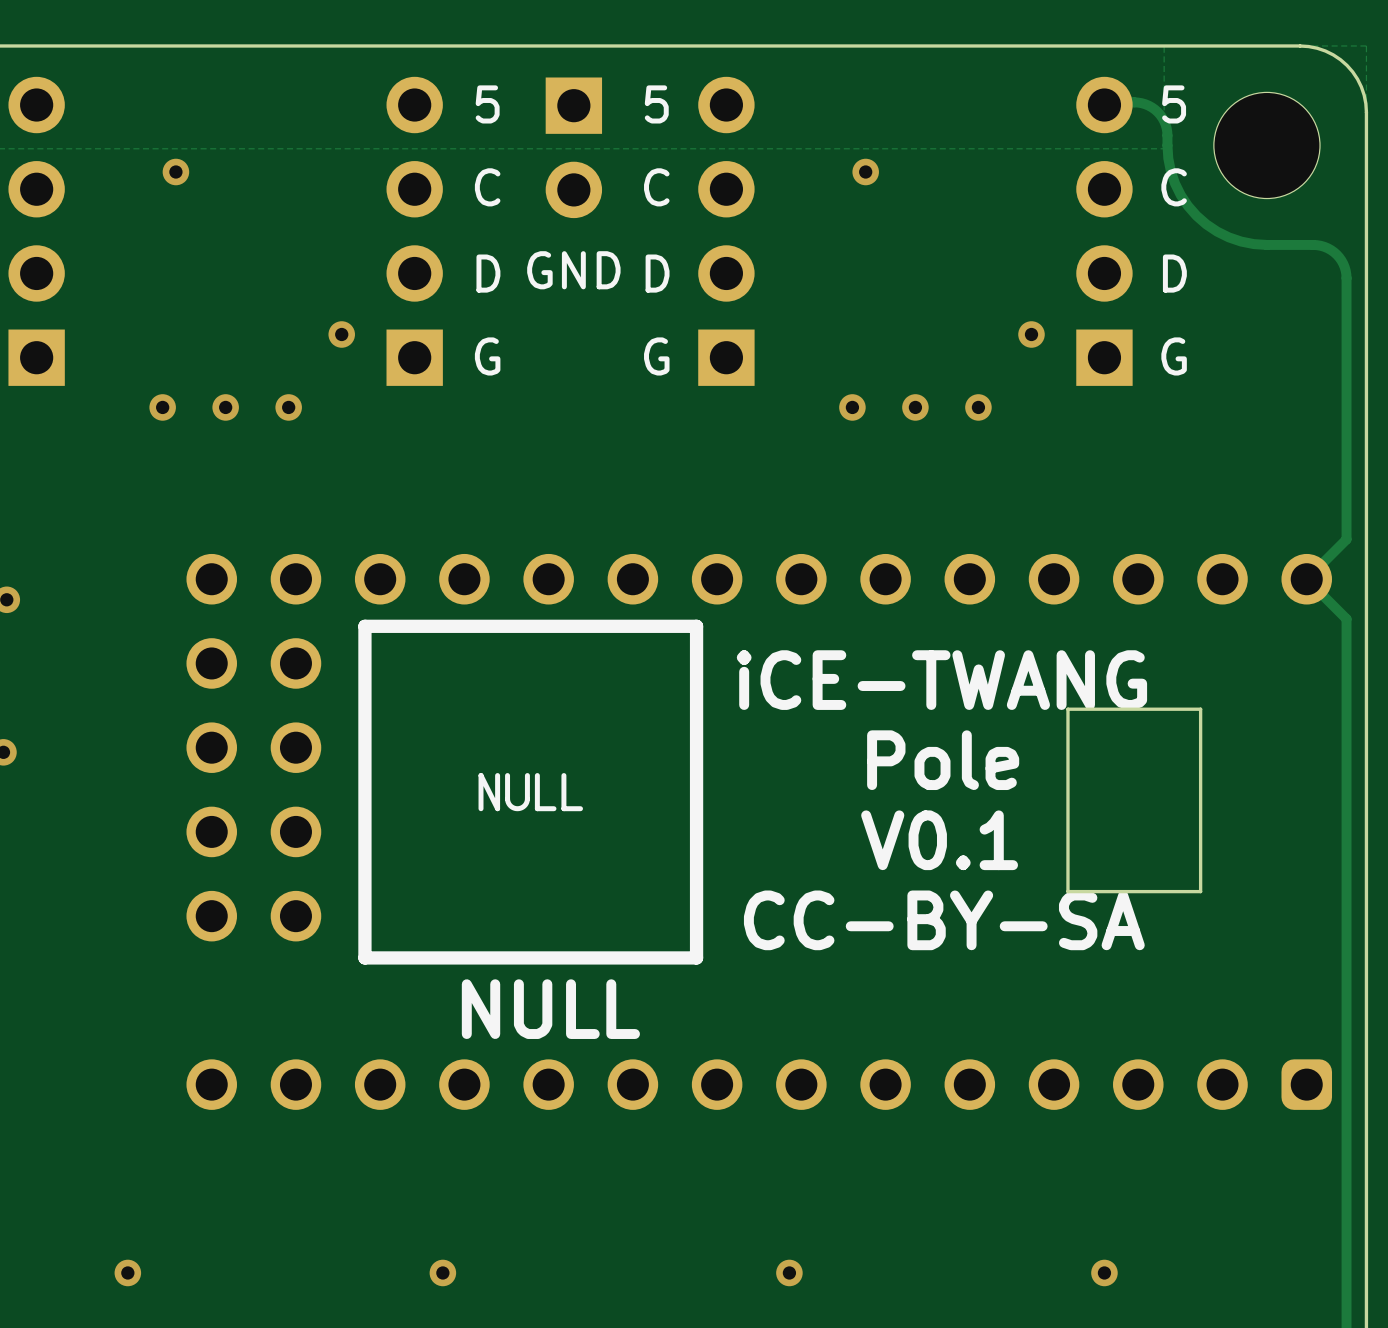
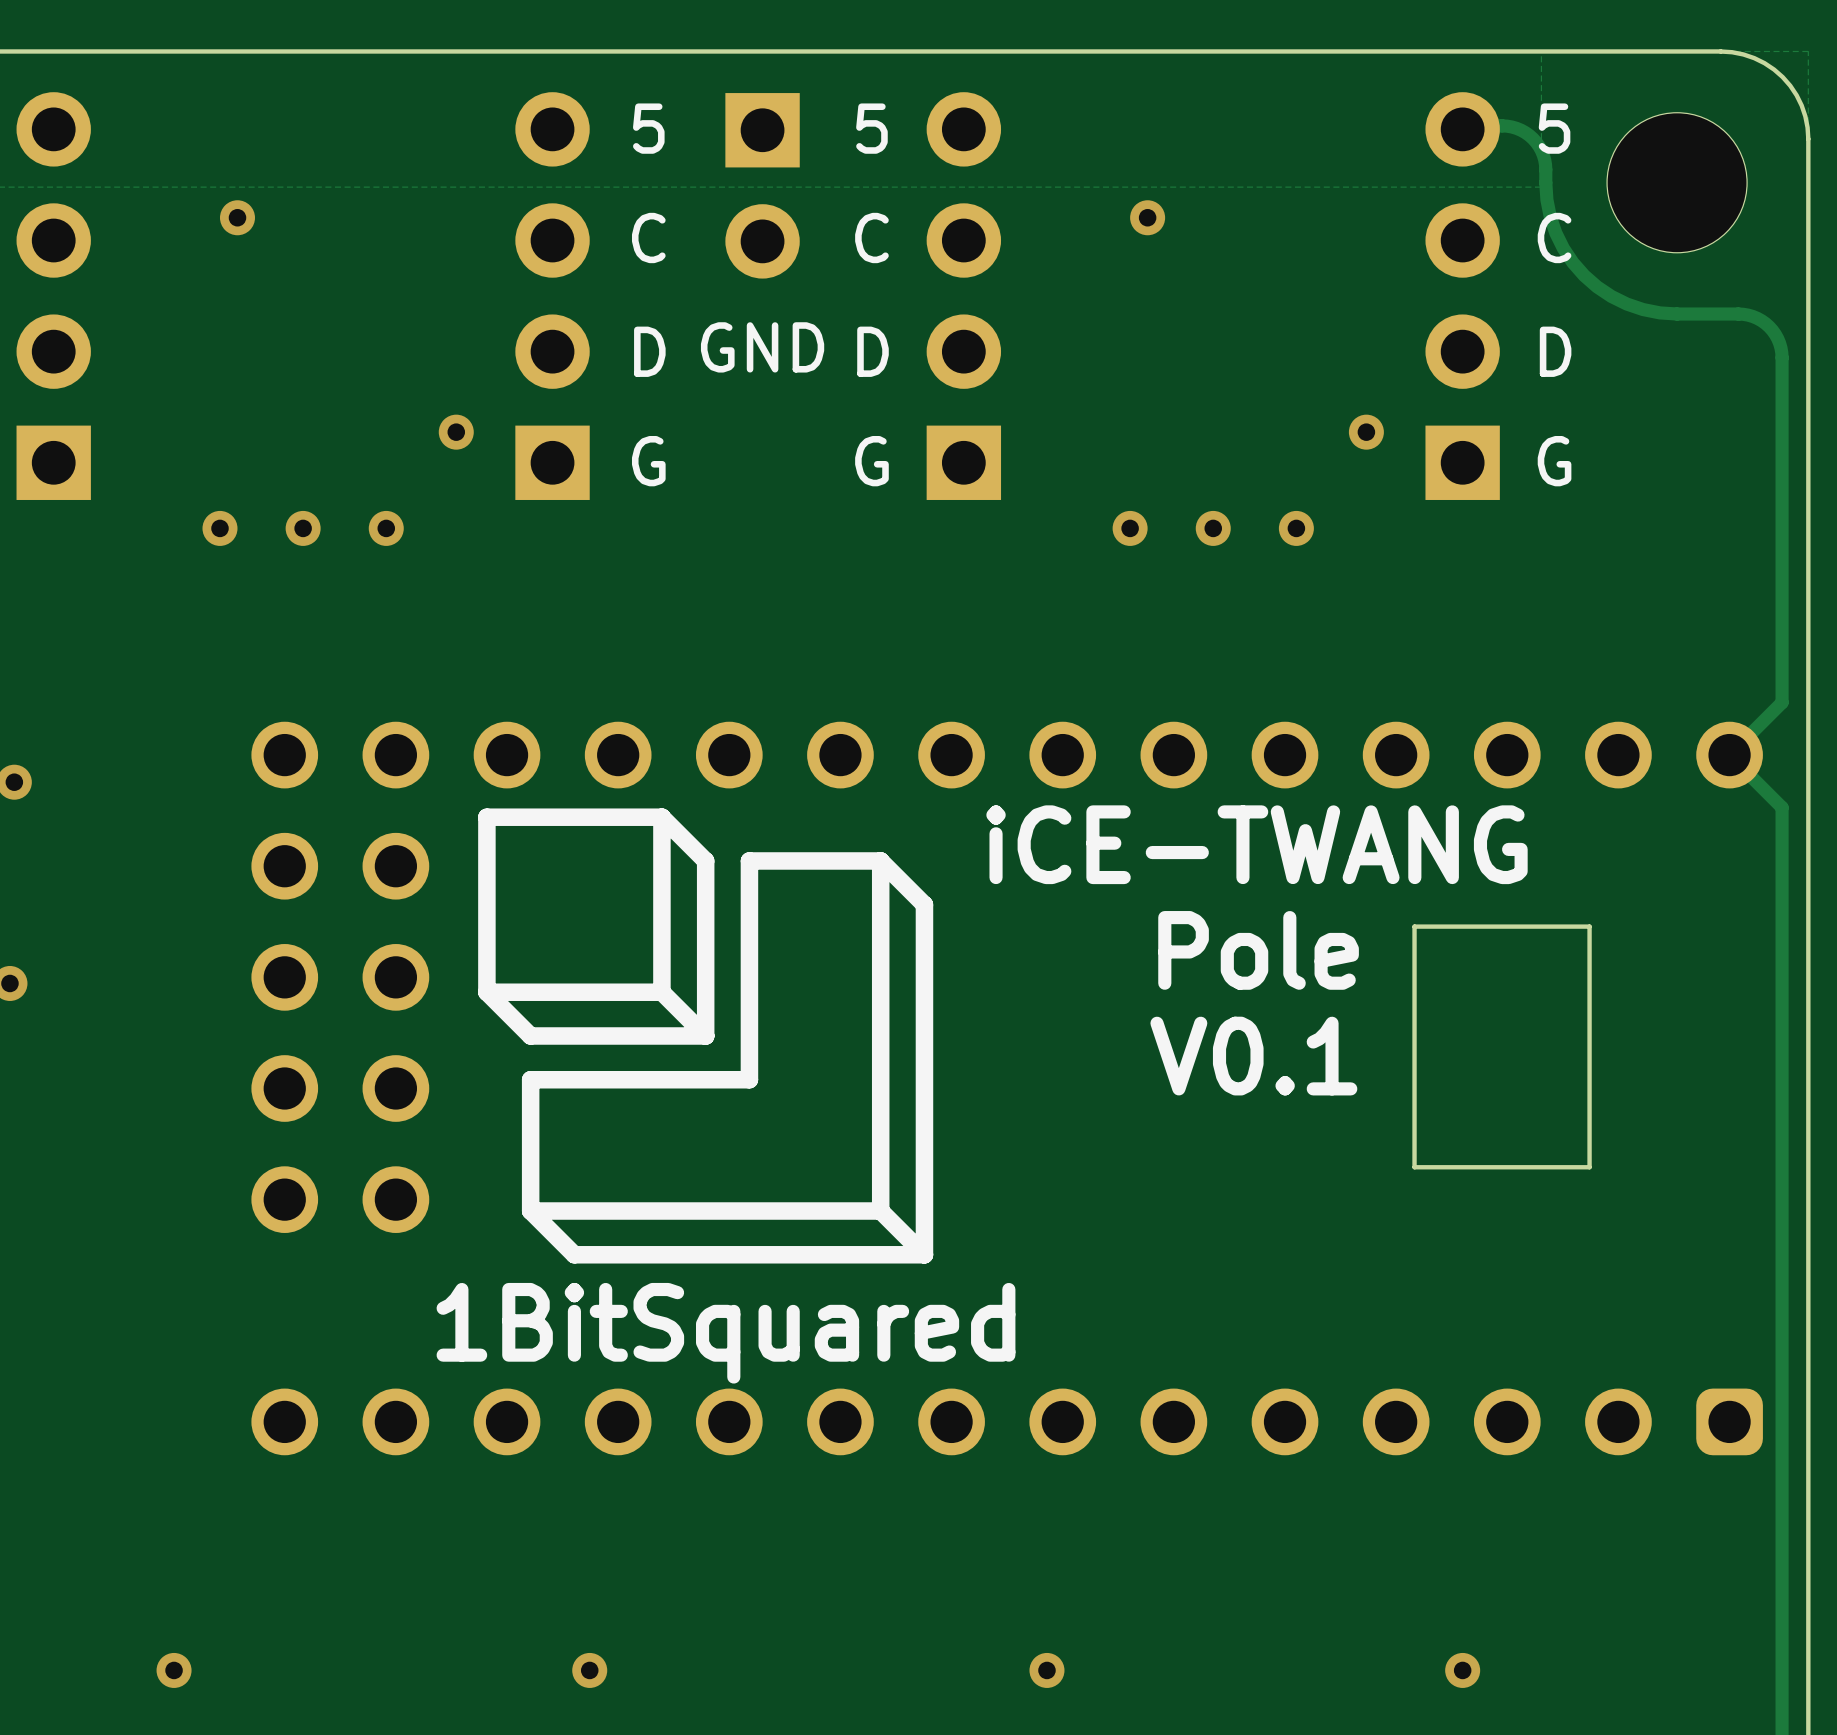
drawing shape: [358, 619, 704, 965] -> [478, 808, 934, 1264]
text position: iCE-TWANG (941, 680) -> iCE-TWANG (1257, 844)
text position: Pole (943, 760) -> Pole (1258, 950)
text position: V0.1 (939, 840) -> V0.1 (1253, 1056)
text: CC-BY-SA (944, 920) -> none
text: NULL (550, 1009) -> 1BitSquared (726, 1333)

